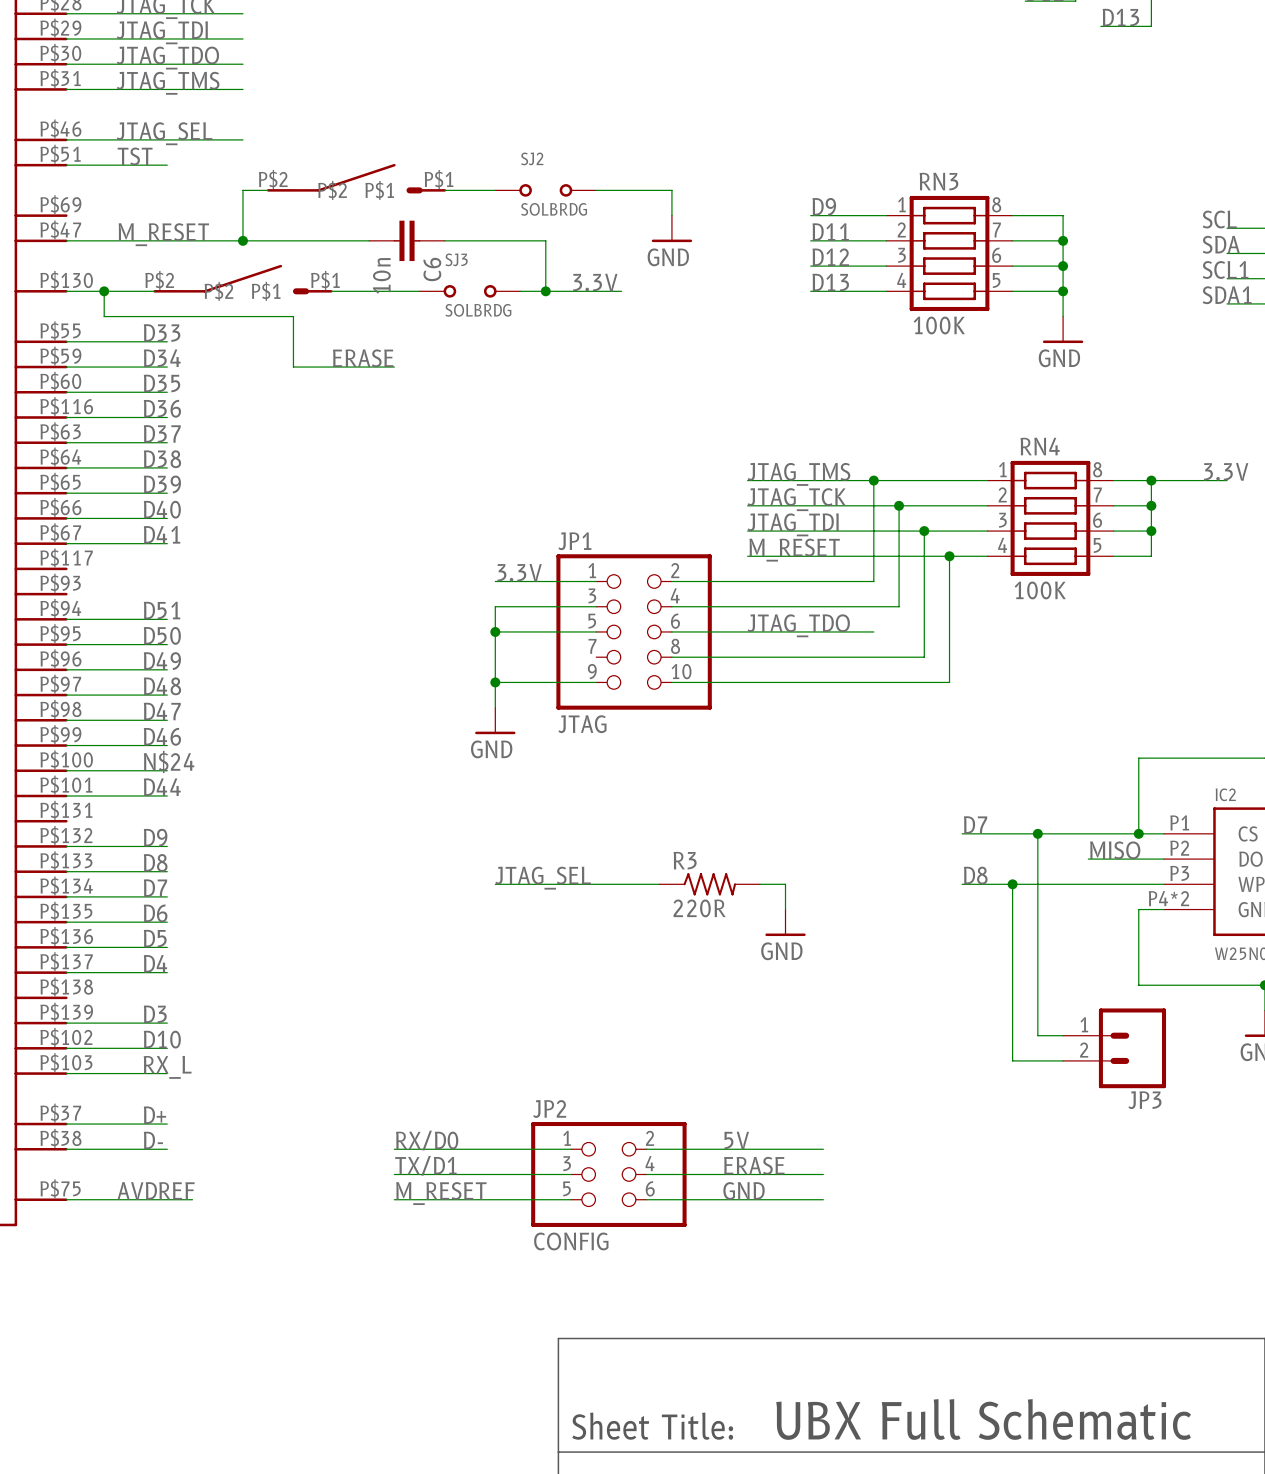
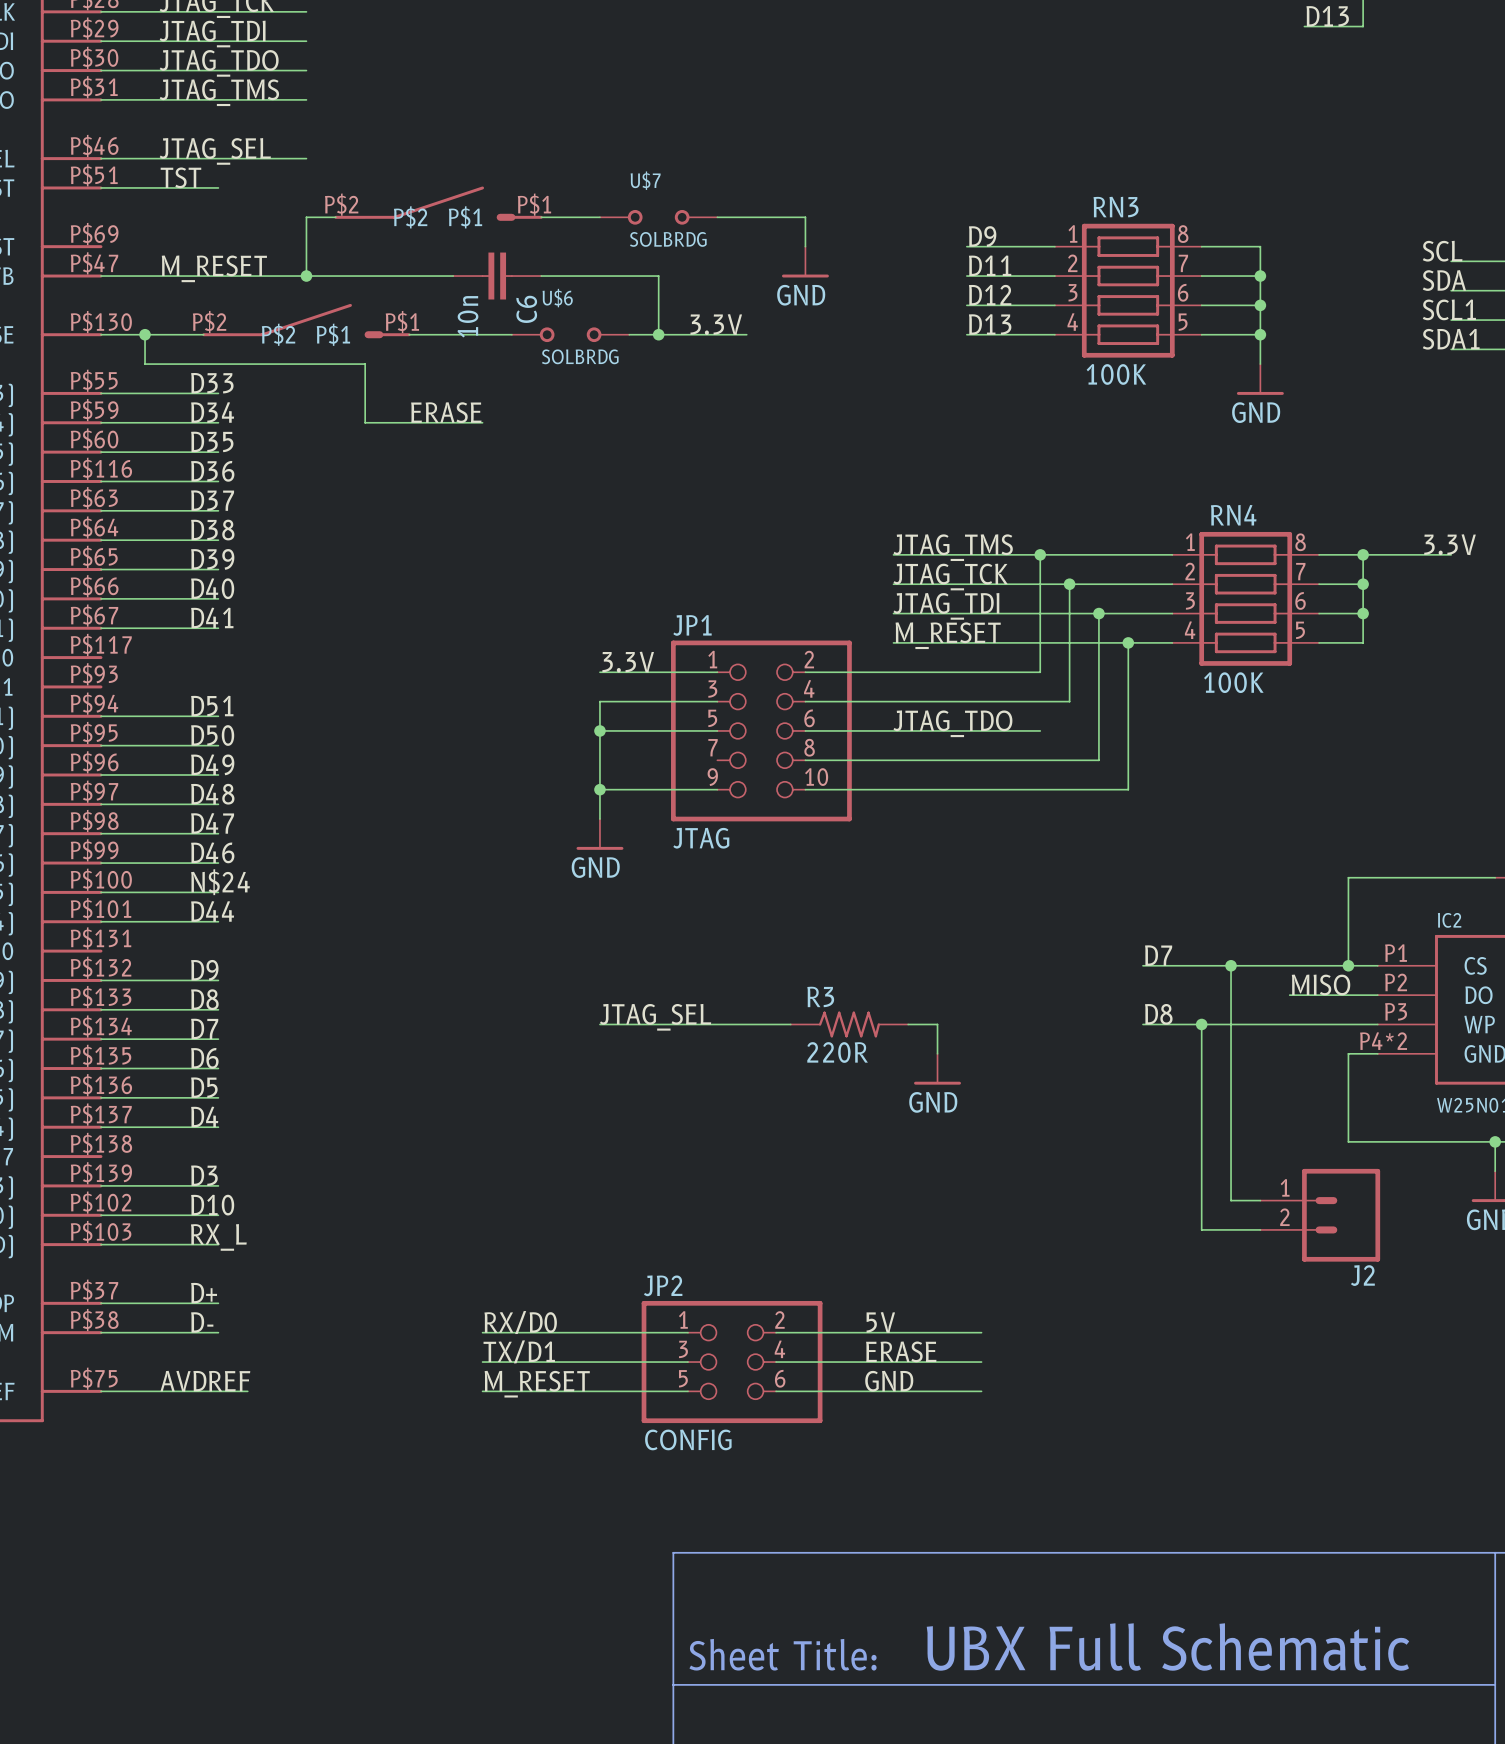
SJ2 name: SJ2 (532, 158) -> U$7 (645, 180)
SJ3 name: SJ3 (456, 259) -> U$6 (557, 298)
JP3 name: JP3 (1144, 1100) -> J2 (1362, 1275)

